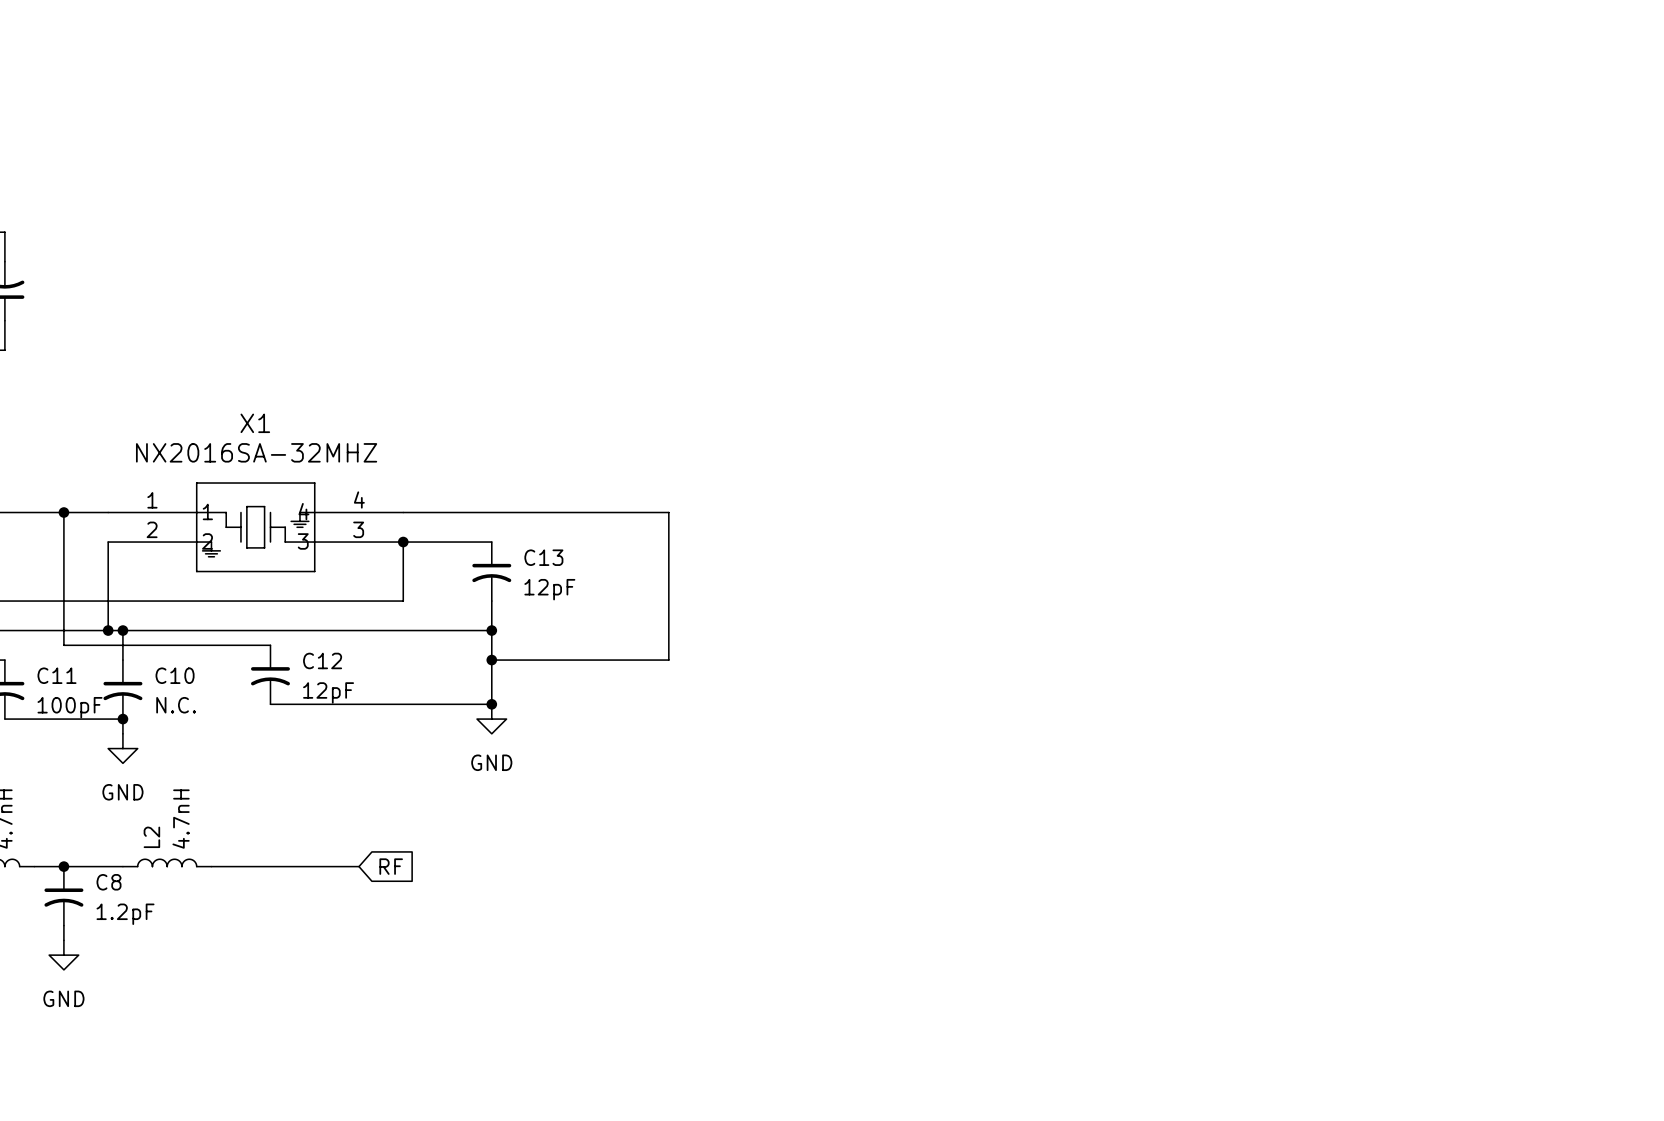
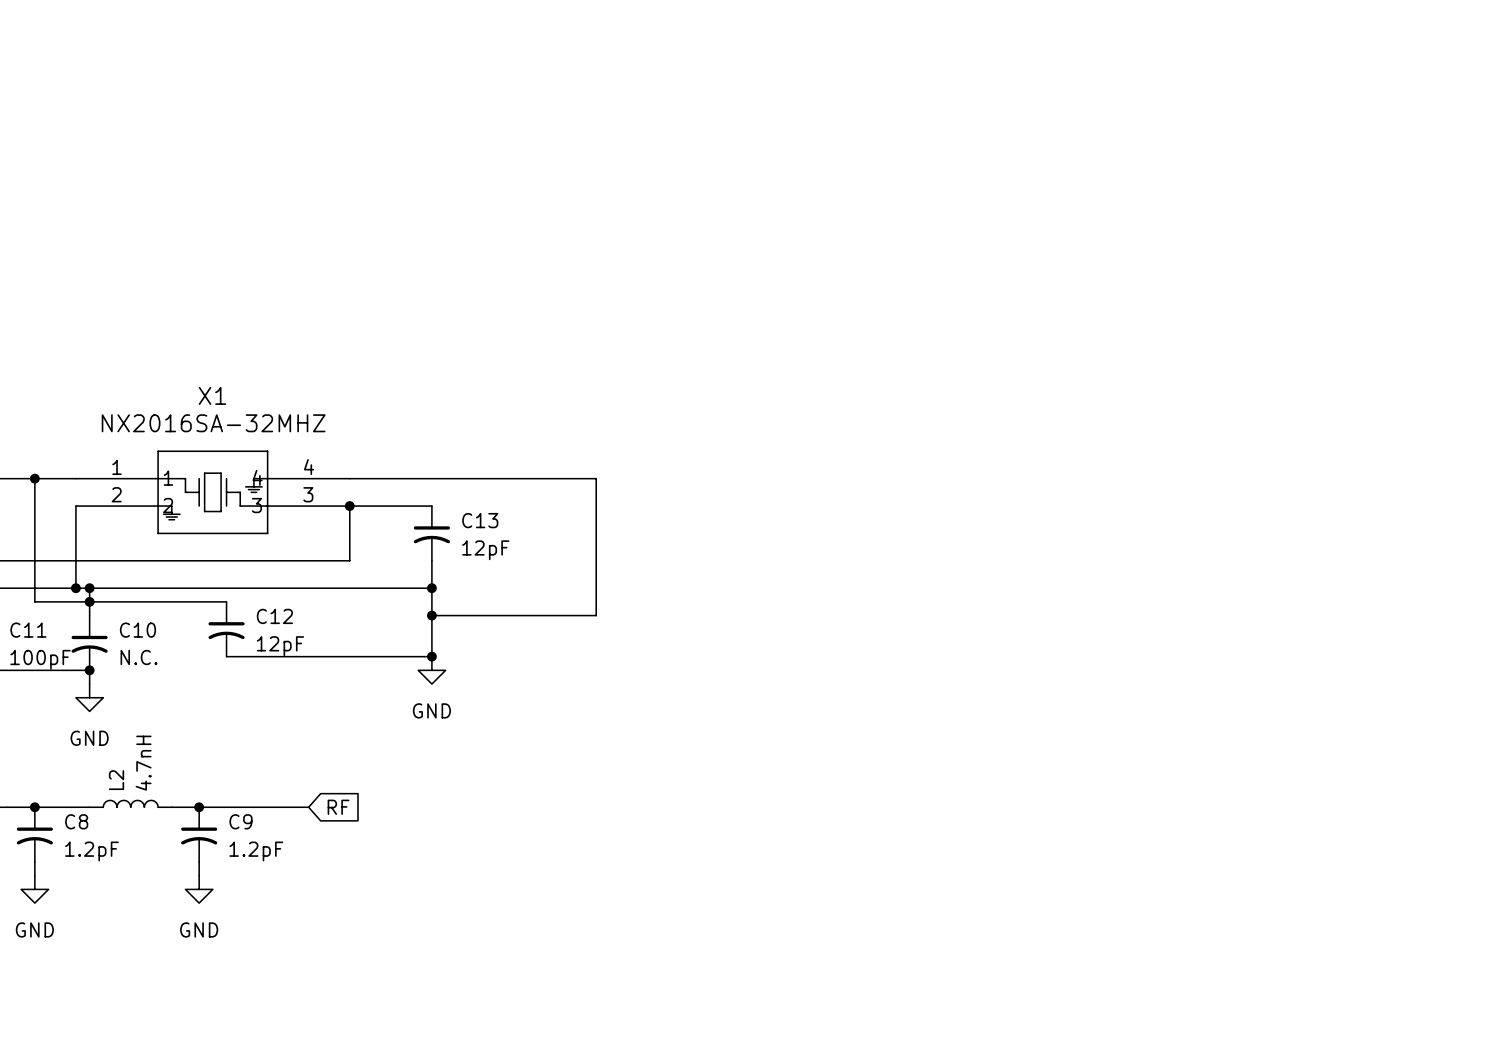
junction: none -> (89, 601)
junction: none -> (199, 807)
C9: none -> 1.2pF (199, 834)
wire: none -> (199, 862) (199, 875)
power symbol: none -> GND (199, 889)

